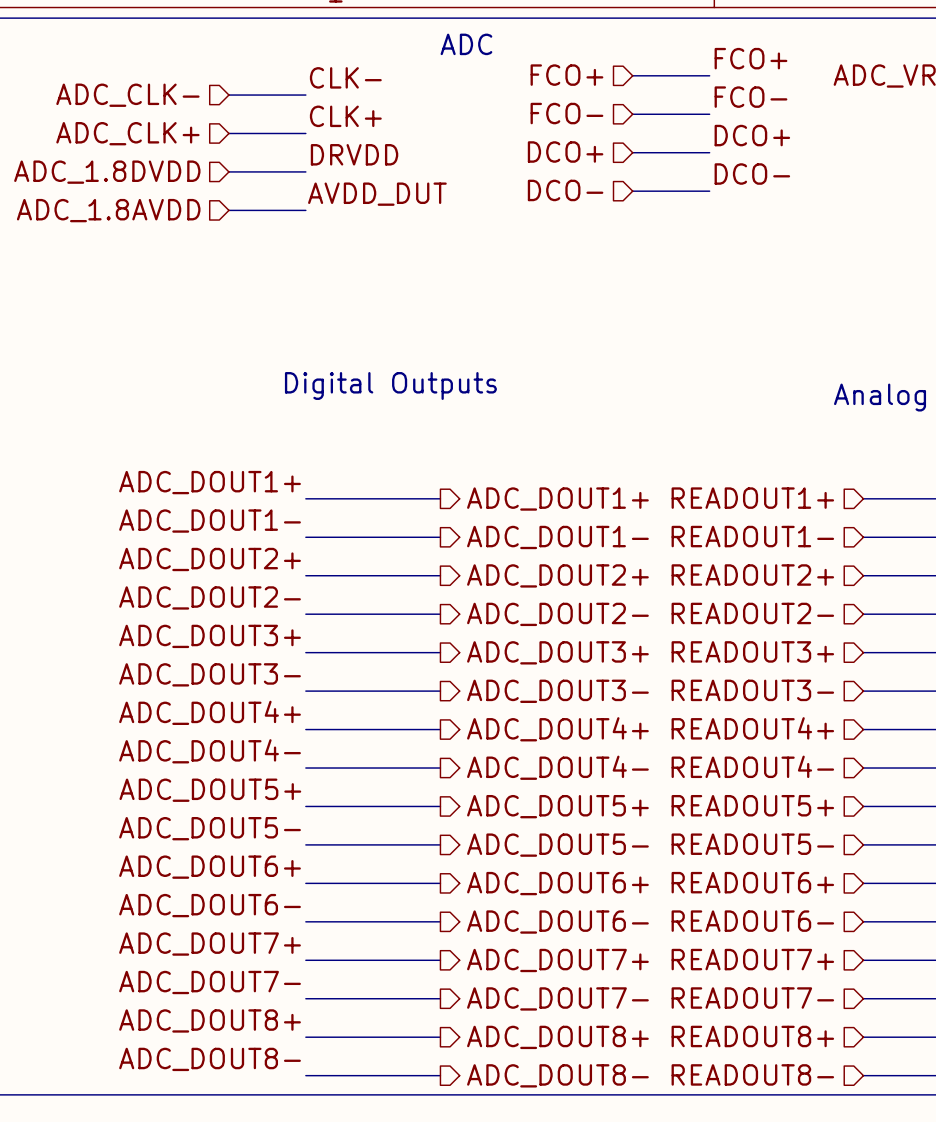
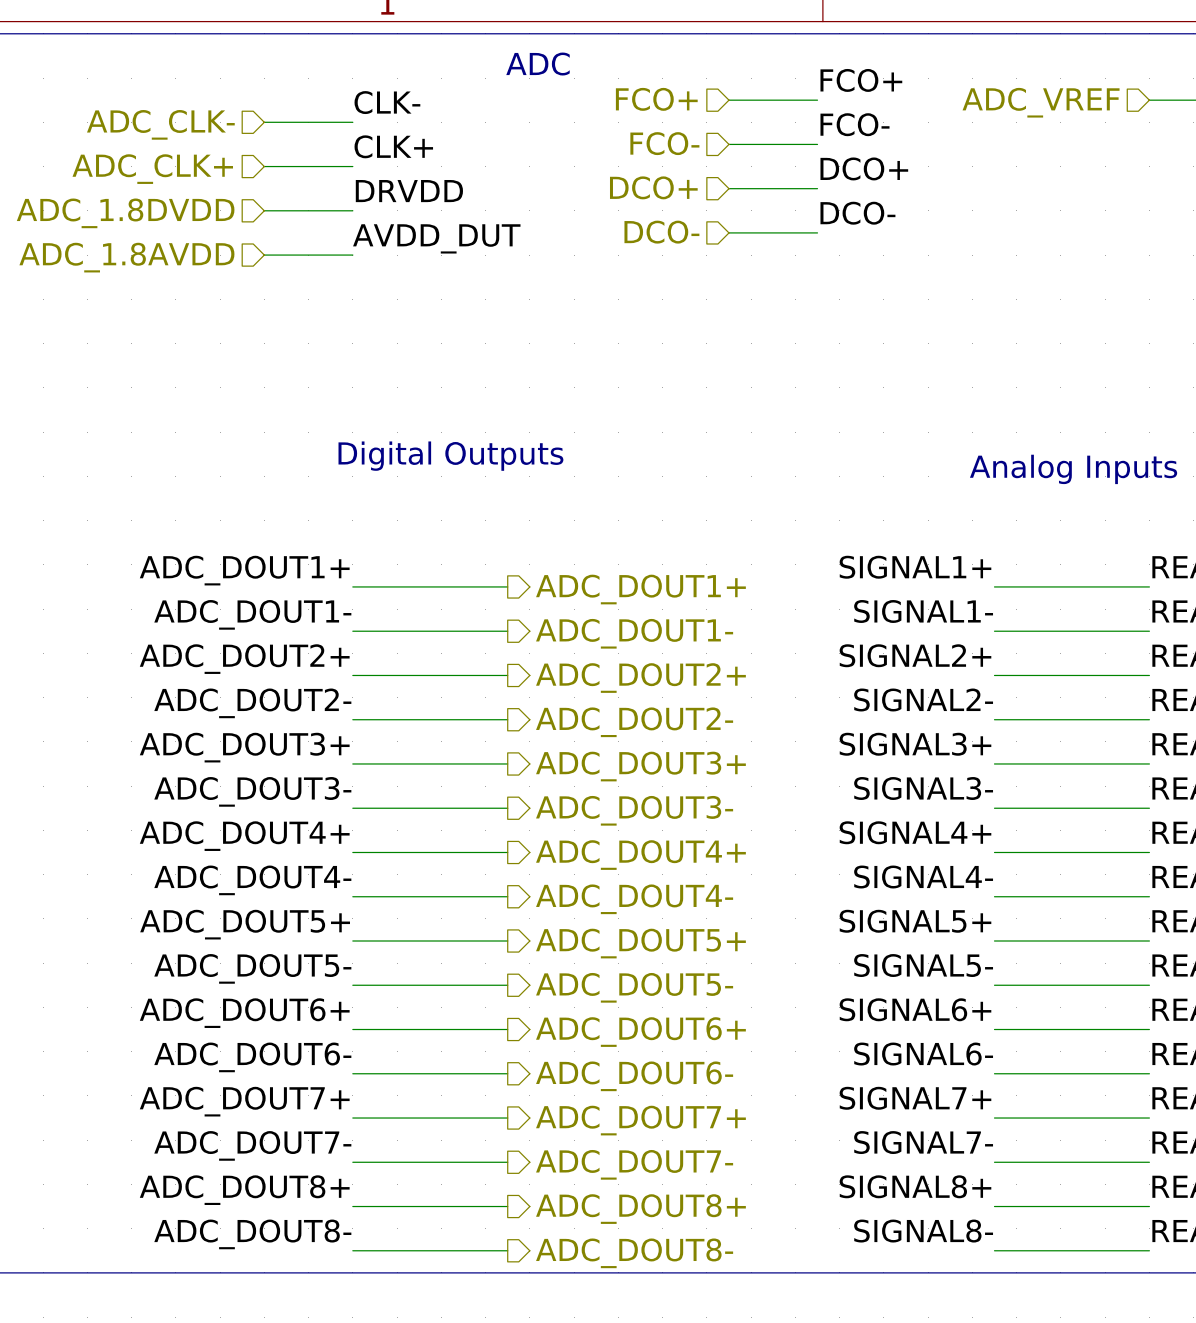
label: none -> SIGNAL1+ (915, 567)
hierarchical label: READOUT1+ (752, 498) -> none
label: none -> SIGNAL1- (923, 611)
hierarchical label: READOUT1- (752, 536) -> none
label: none -> SIGNAL2+ (915, 655)
hierarchical label: READOUT2+ (752, 575) -> none
label: none -> SIGNAL2- (923, 699)
hierarchical label: READOUT2- (752, 613) -> none
label: none -> SIGNAL3+ (915, 744)
hierarchical label: READOUT3+ (752, 651) -> none
label: none -> SIGNAL3- (923, 788)
hierarchical label: READOUT3- (752, 690) -> none
label: none -> SIGNAL4+ (915, 832)
hierarchical label: READOUT4+ (752, 728) -> none
label: none -> SIGNAL4- (923, 877)
hierarchical label: READOUT4- (752, 766) -> none
label: none -> SIGNAL5+ (915, 921)
hierarchical label: READOUT5+ (752, 805) -> none
label: none -> SIGNAL5- (923, 965)
hierarchical label: READOUT5- (752, 844) -> none
label: none -> SIGNAL6+ (915, 1009)
hierarchical label: READOUT6+ (752, 882) -> none
label: none -> SIGNAL6- (923, 1054)
hierarchical label: READOUT6- (752, 921) -> none
label: none -> SIGNAL7+ (915, 1098)
hierarchical label: READOUT7+ (752, 959) -> none
label: none -> SIGNAL7- (923, 1142)
hierarchical label: READOUT7- (752, 998) -> none
label: none -> SIGNAL8+ (915, 1186)
hierarchical label: READOUT8+ (752, 1036) -> none
label: none -> SIGNAL8- (923, 1231)
hierarchical label: READOUT8- (752, 1074) -> none

